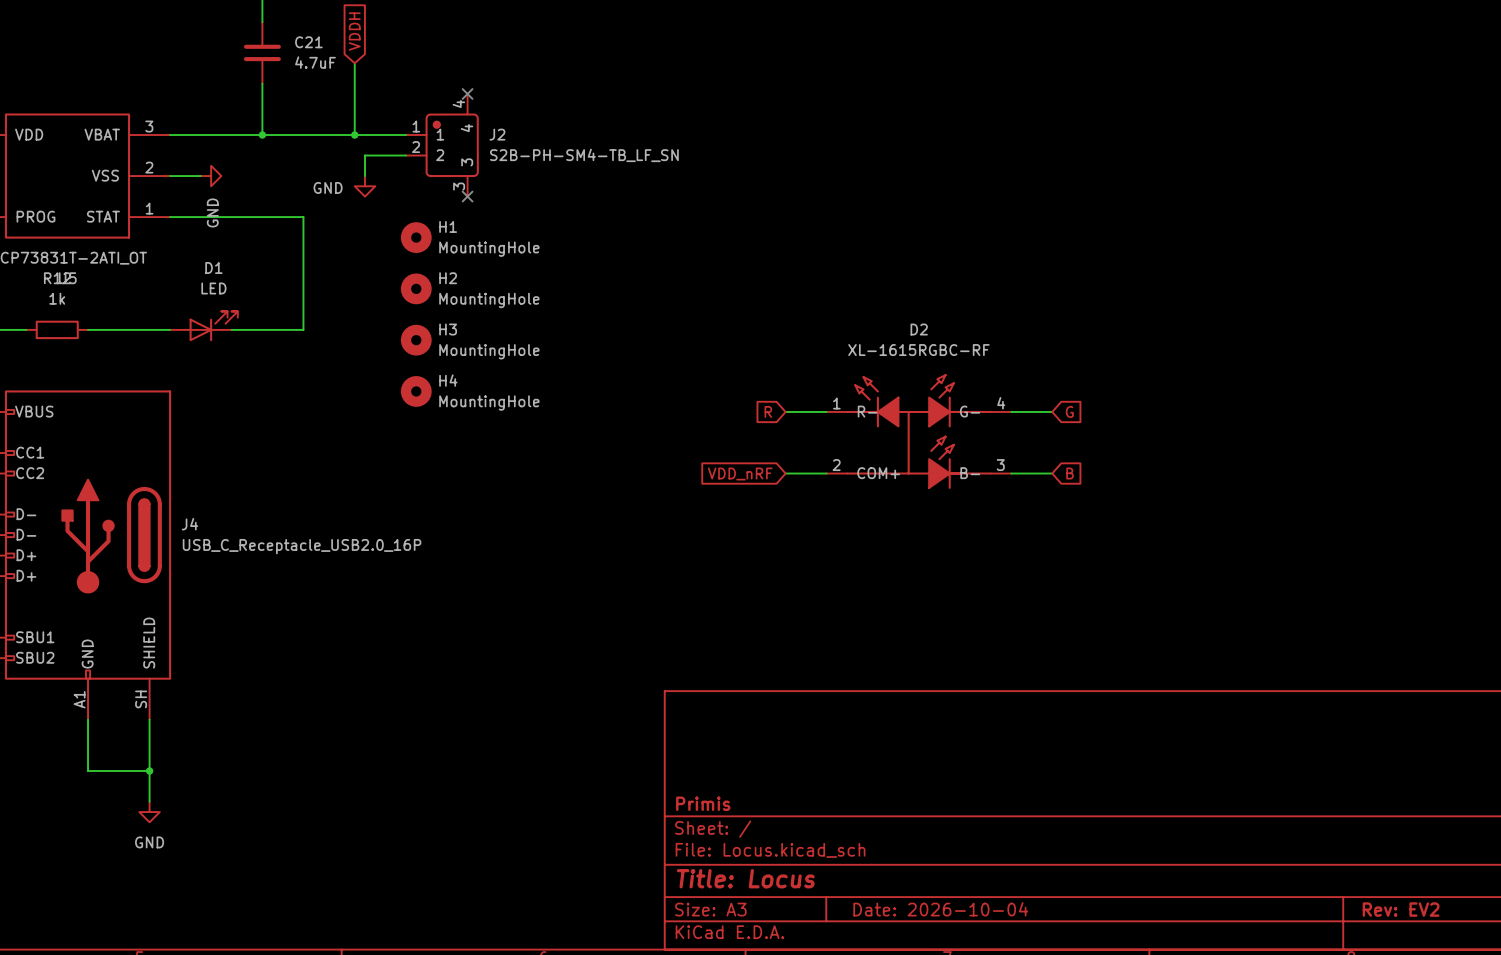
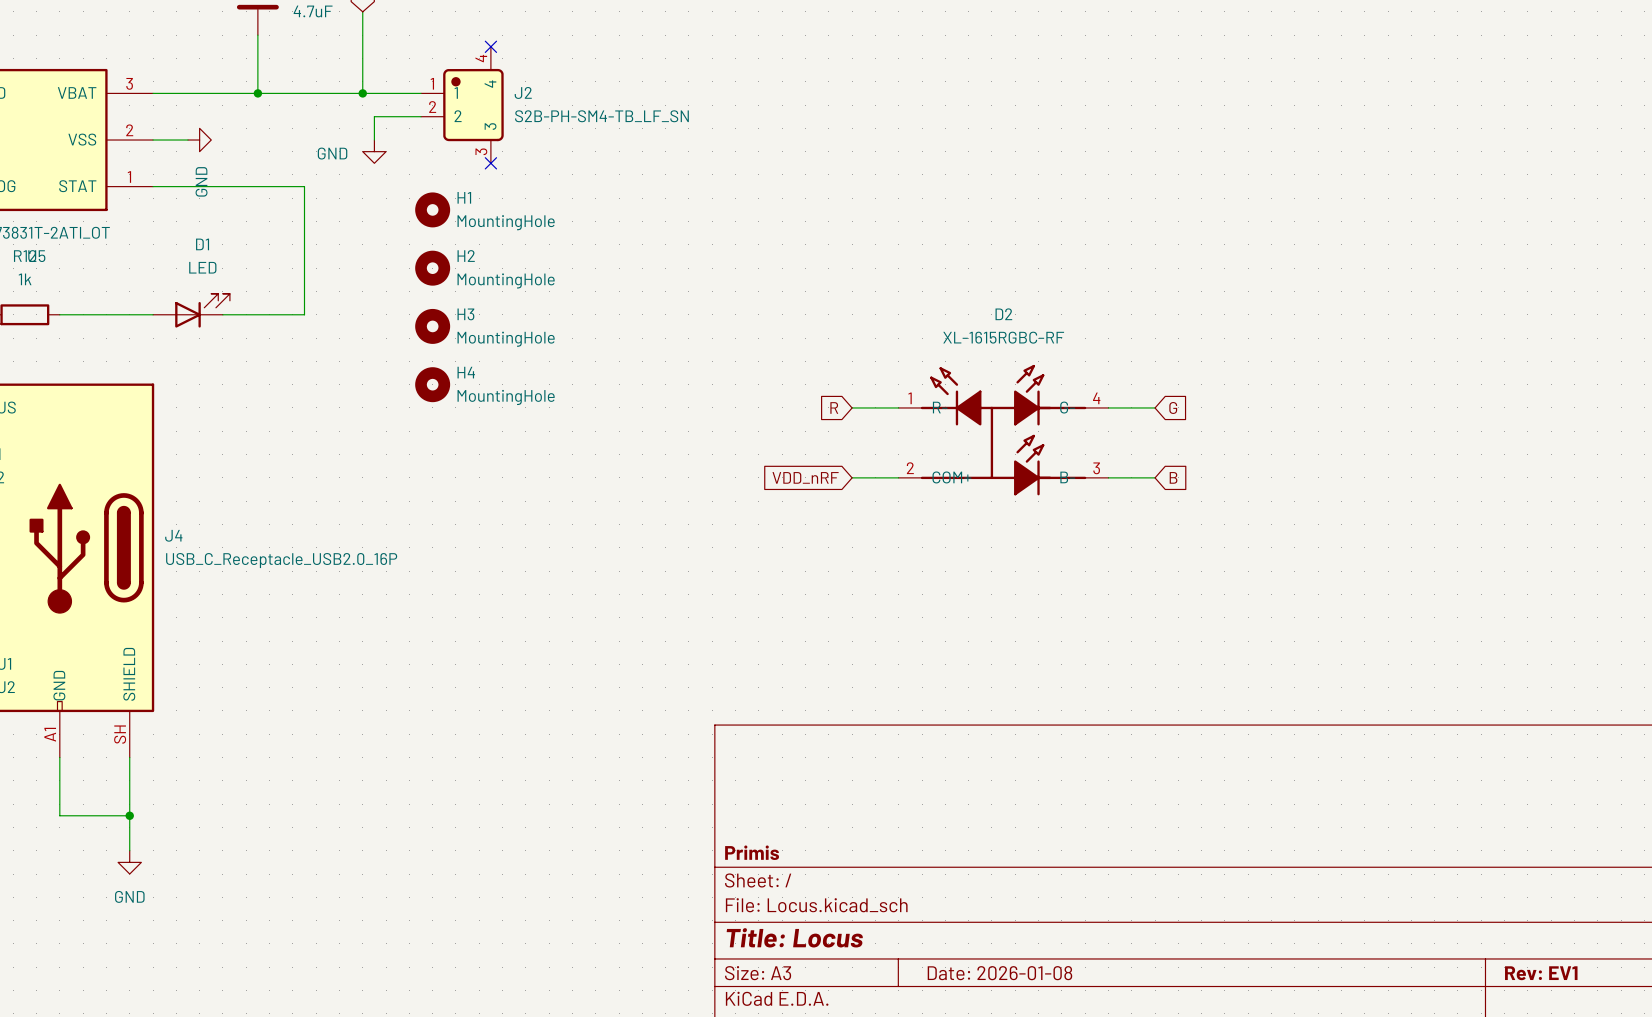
title block: Date: 2026-10-04 (940, 909) -> Date: 2026-01-08 (999, 973)
title block: Rev: EV2 (1401, 909) -> Rev: EV1 (1541, 973)

